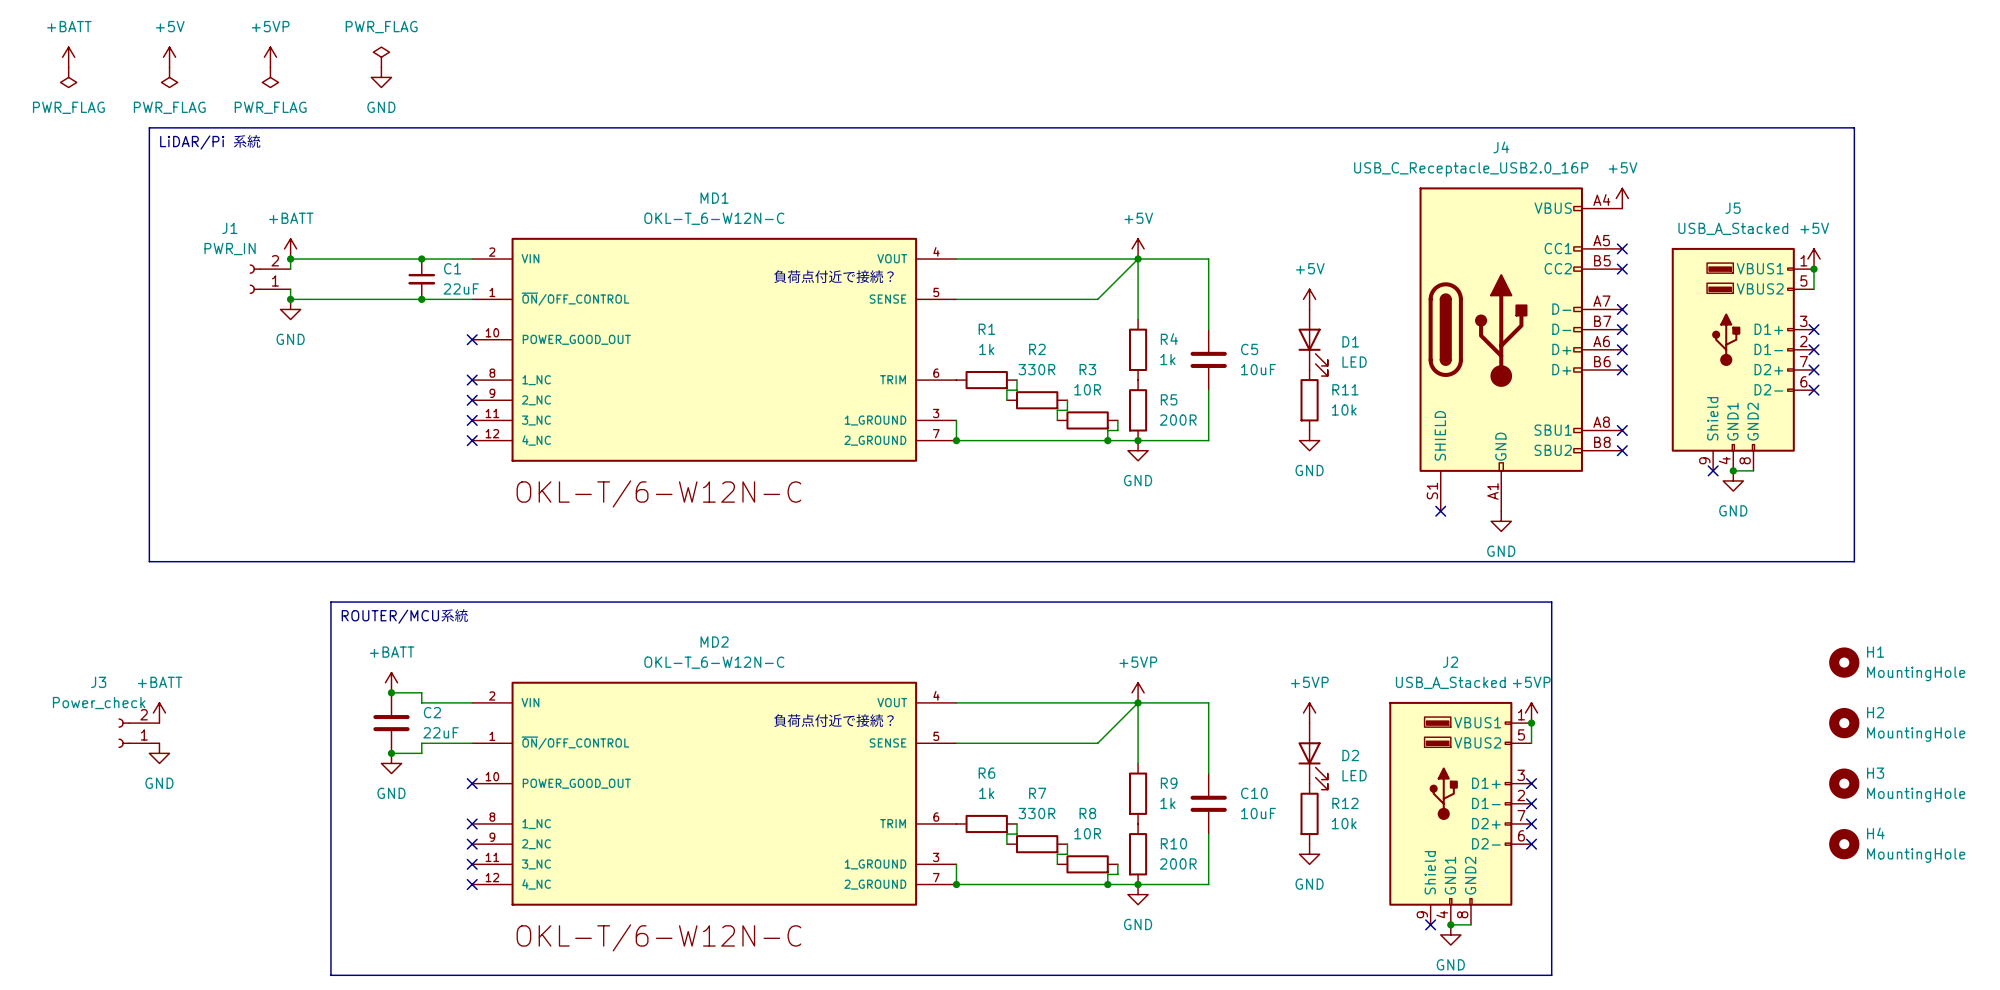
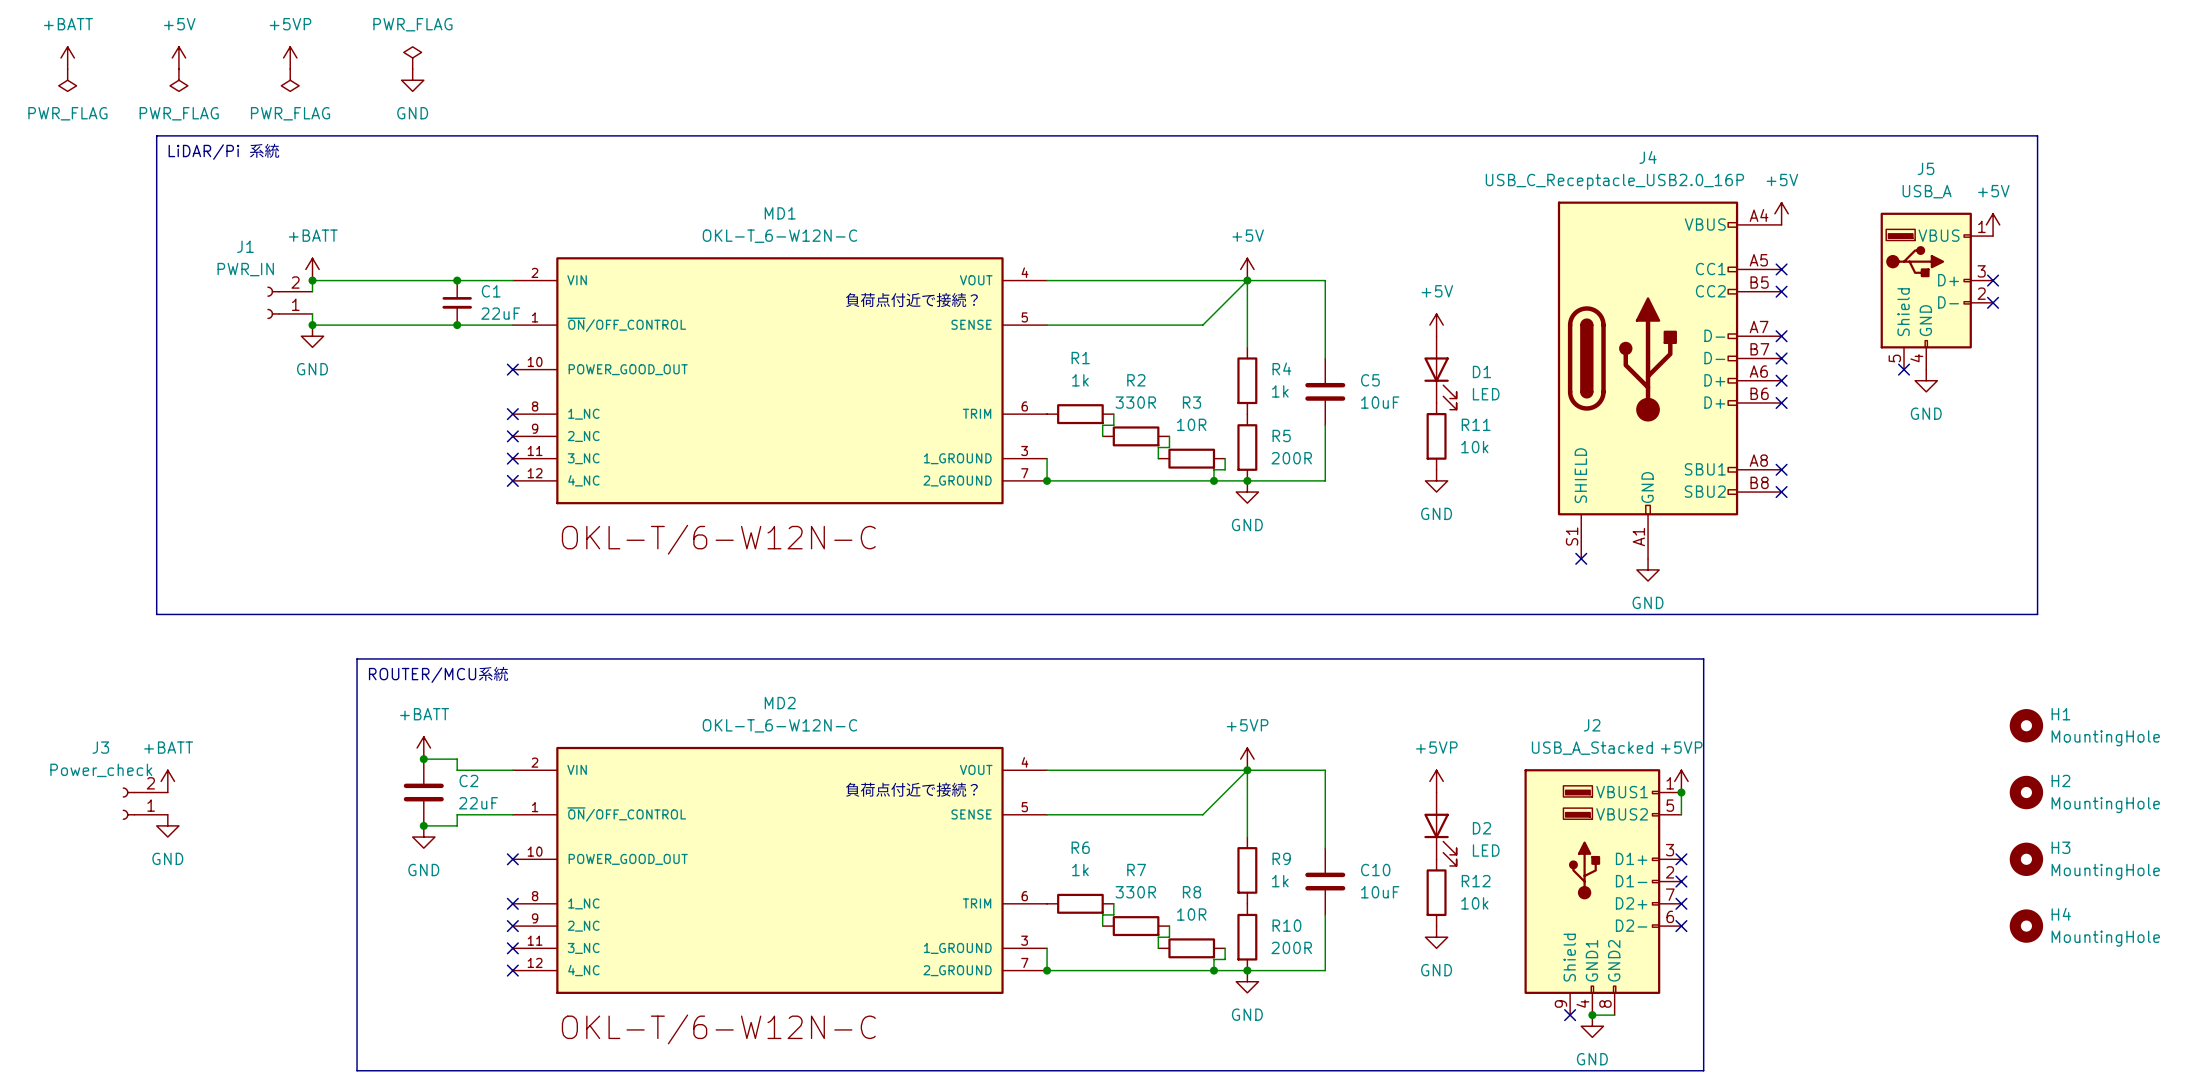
J5 name position: J5 (1733, 208) -> J5 (1926, 168)
J5 value: USB_A_Stacked (1733, 228) -> USB_A (1927, 191)
J5 symbol: [1671, 247, 1815, 471] -> [1880, 212, 1994, 370]
no-connect mark: none -> (1993, 280)
power symbol position: +5V (1814, 259) -> +5V (1993, 224)
wire: (1814, 269) (1814, 289) -> none
junction: (1814, 269) -> none
no-connect mark: none -> (1993, 302)
no-connect mark: (1814, 329) -> none
no-connect mark: none -> (1904, 369)
no-connect mark: (1814, 349) -> none
no-connect mark: (1814, 369) -> none
no-connect mark: (1814, 390) -> none
no-connect mark: (1713, 470) -> none
wire: (1733, 470) (1753, 470) -> none
junction: (1733, 470) -> none
power symbol position: GND (1733, 480) -> GND (1926, 380)

